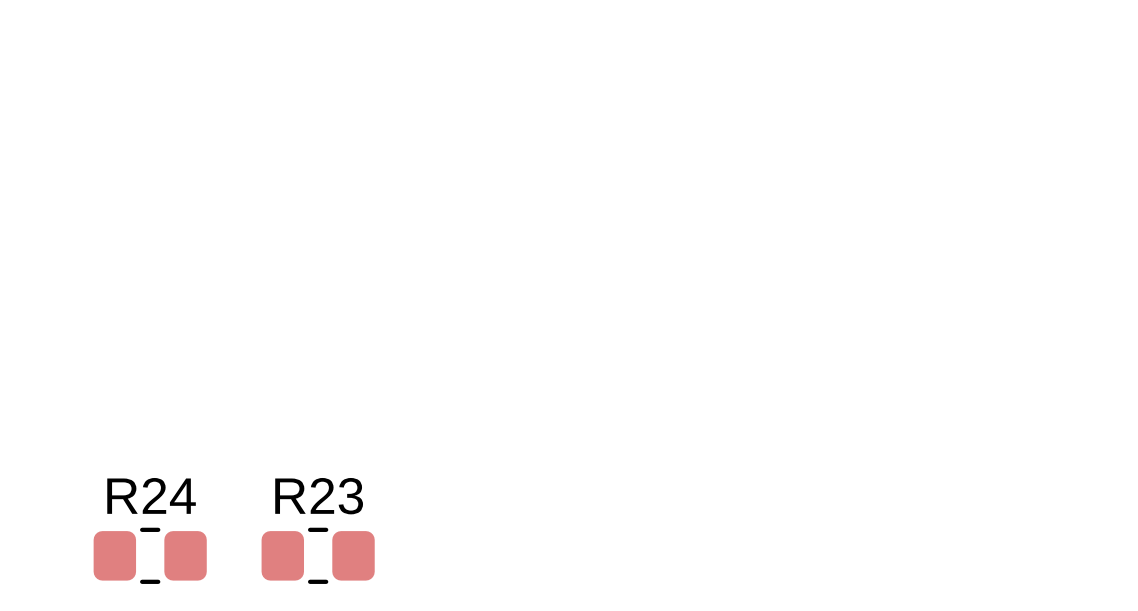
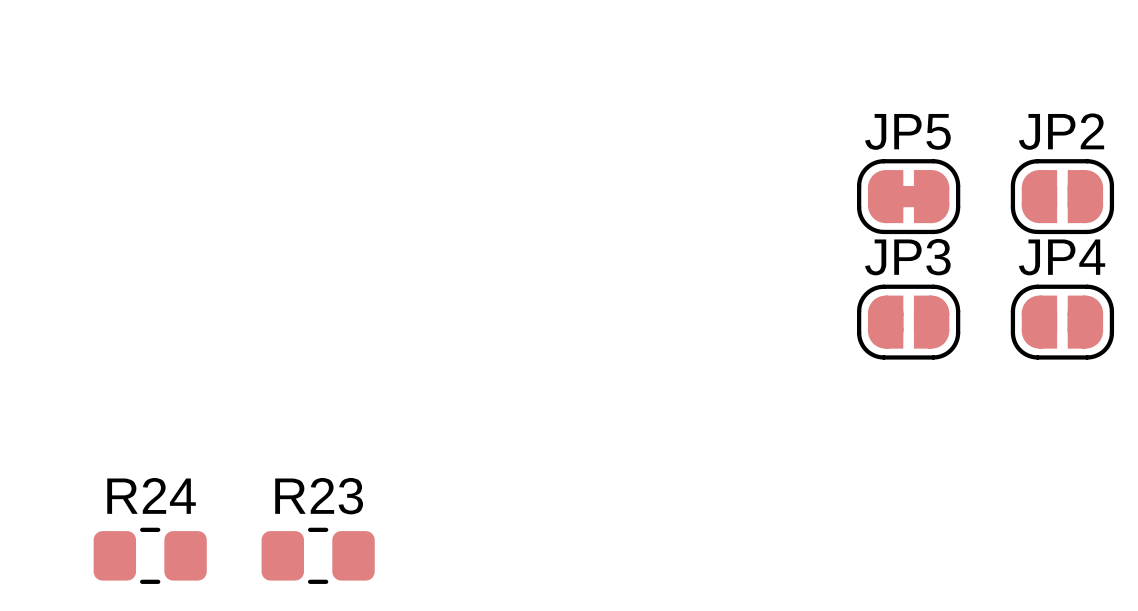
JP5: none -> (908, 196)
JP2: none -> (1062, 196)
JP3: none -> (908, 322)
JP4: none -> (1062, 322)

